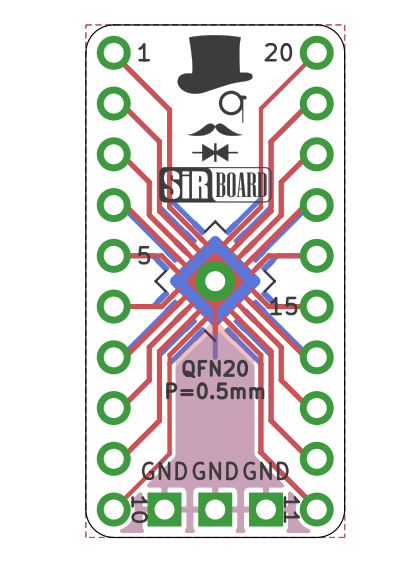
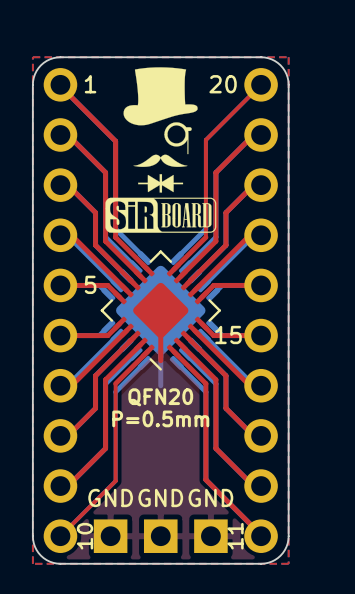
via: (215, 281) -> none
text rotation: 0° (139, 509) -> 180° (85, 536)
text rotation: 0° (291, 509) -> 180° (235, 536)

